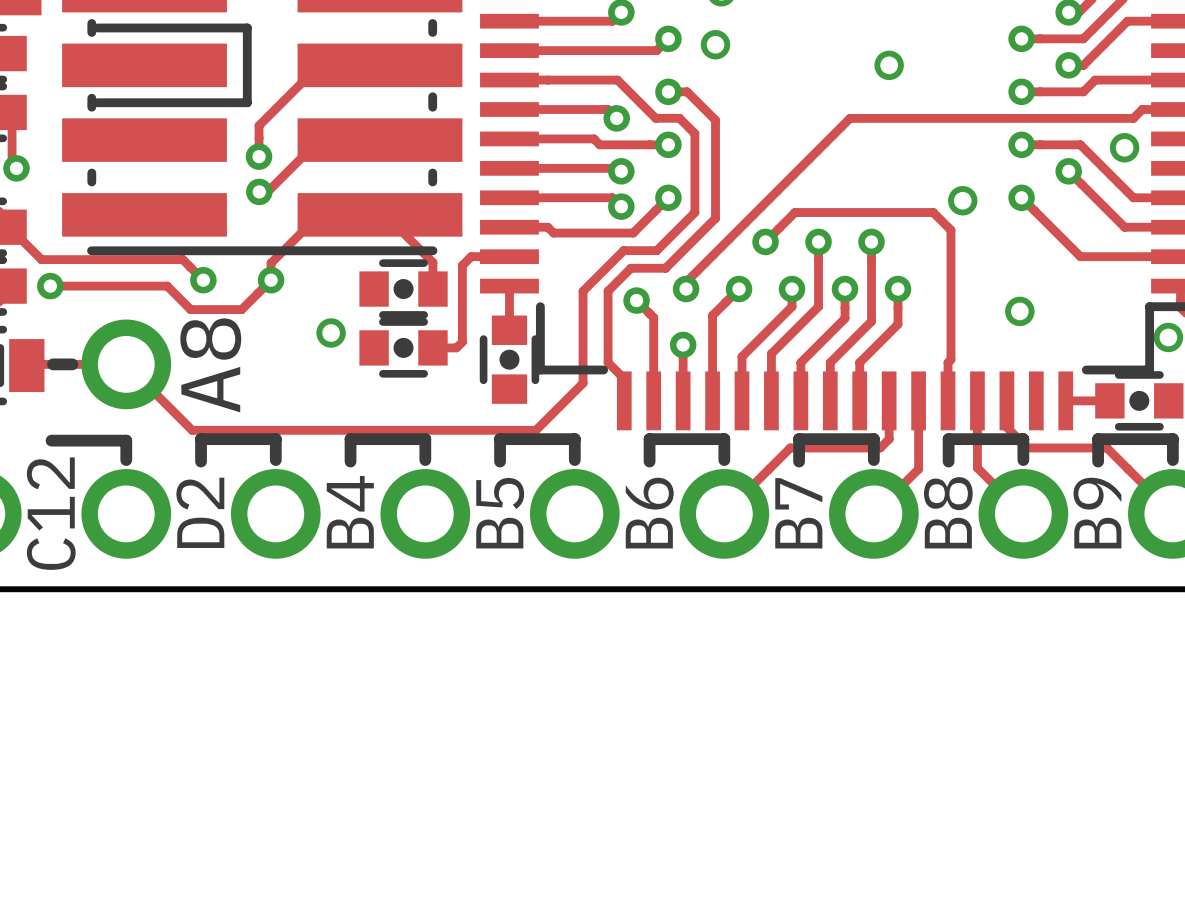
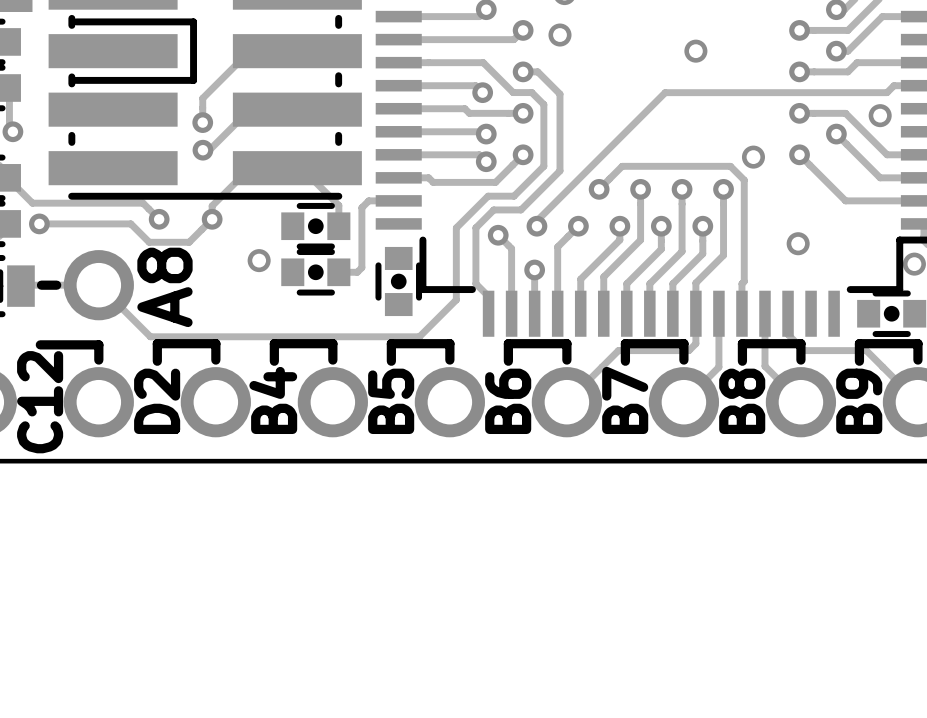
track: none -> (723, 189) (723, 255) (695, 282) (695, 313)
via: none -> (723, 189)
track: (509, 286) (509, 330) -> none
track: (1065, 400) (1109, 400) -> none

